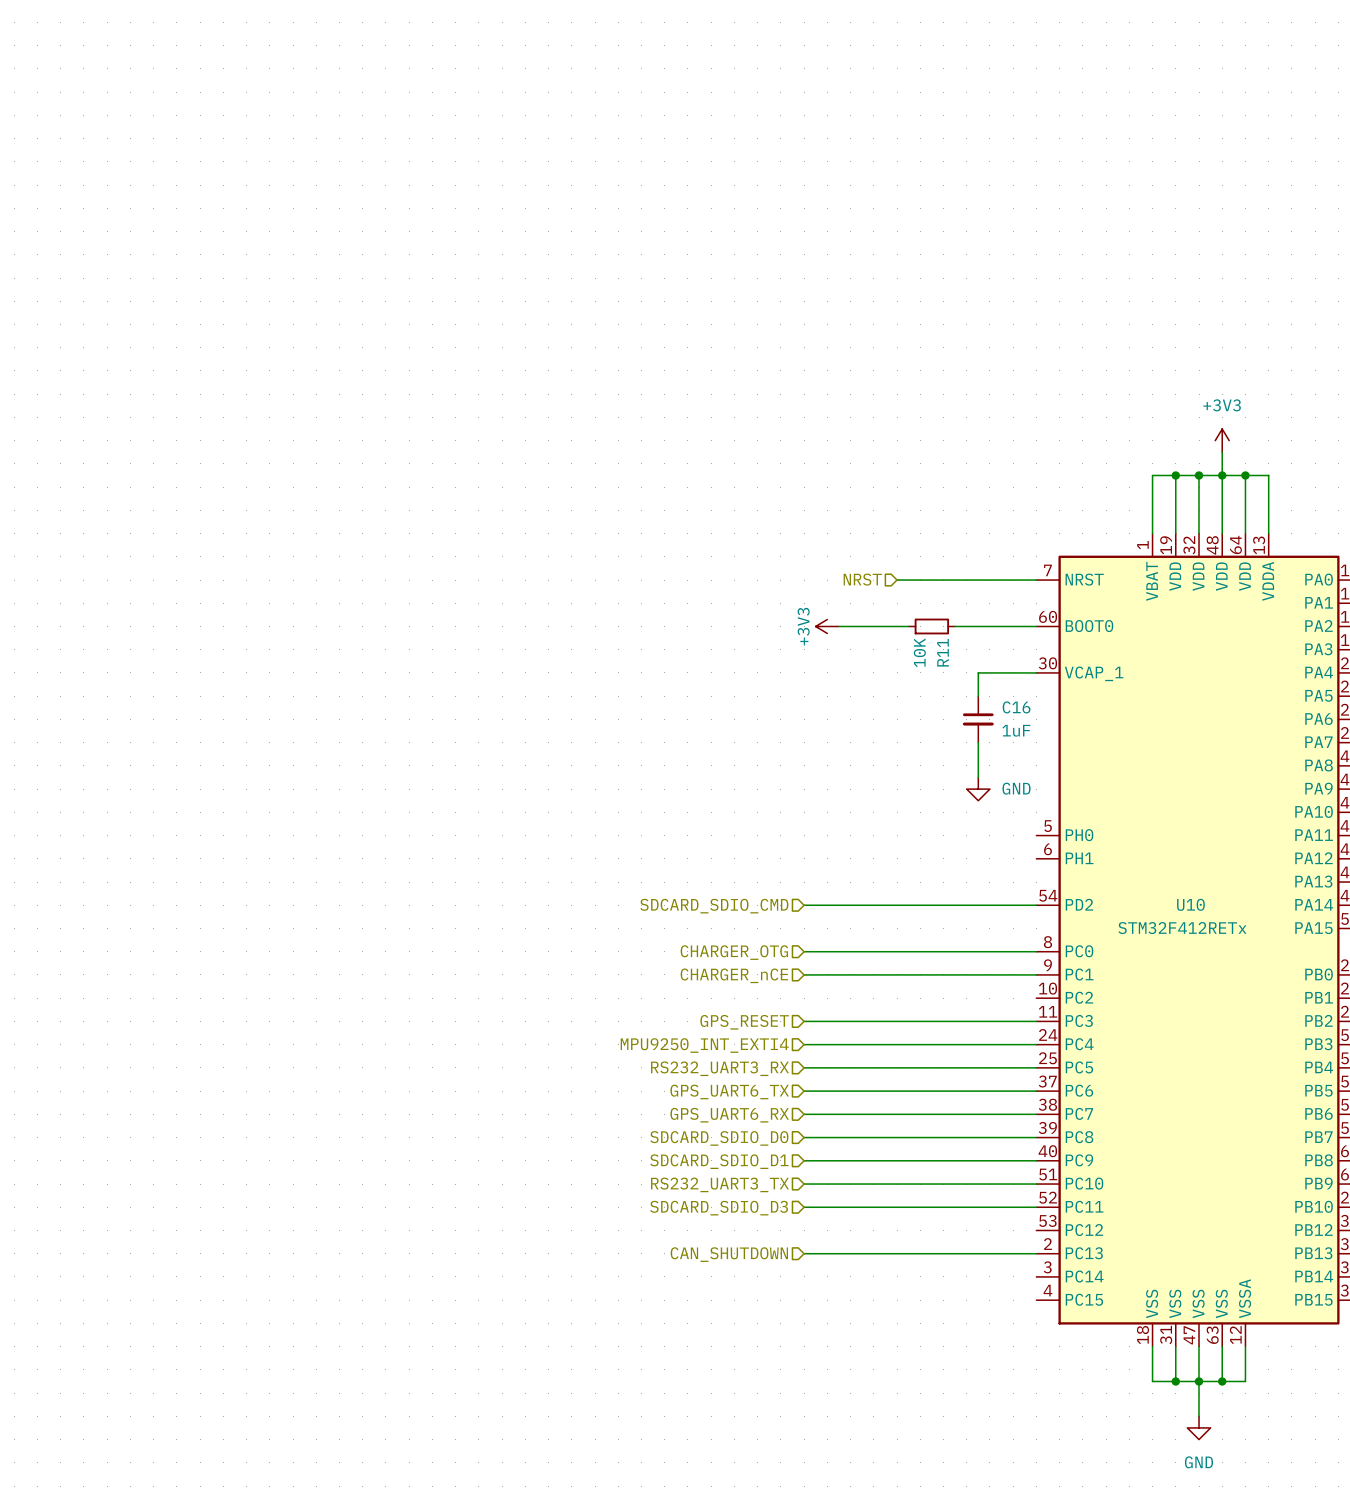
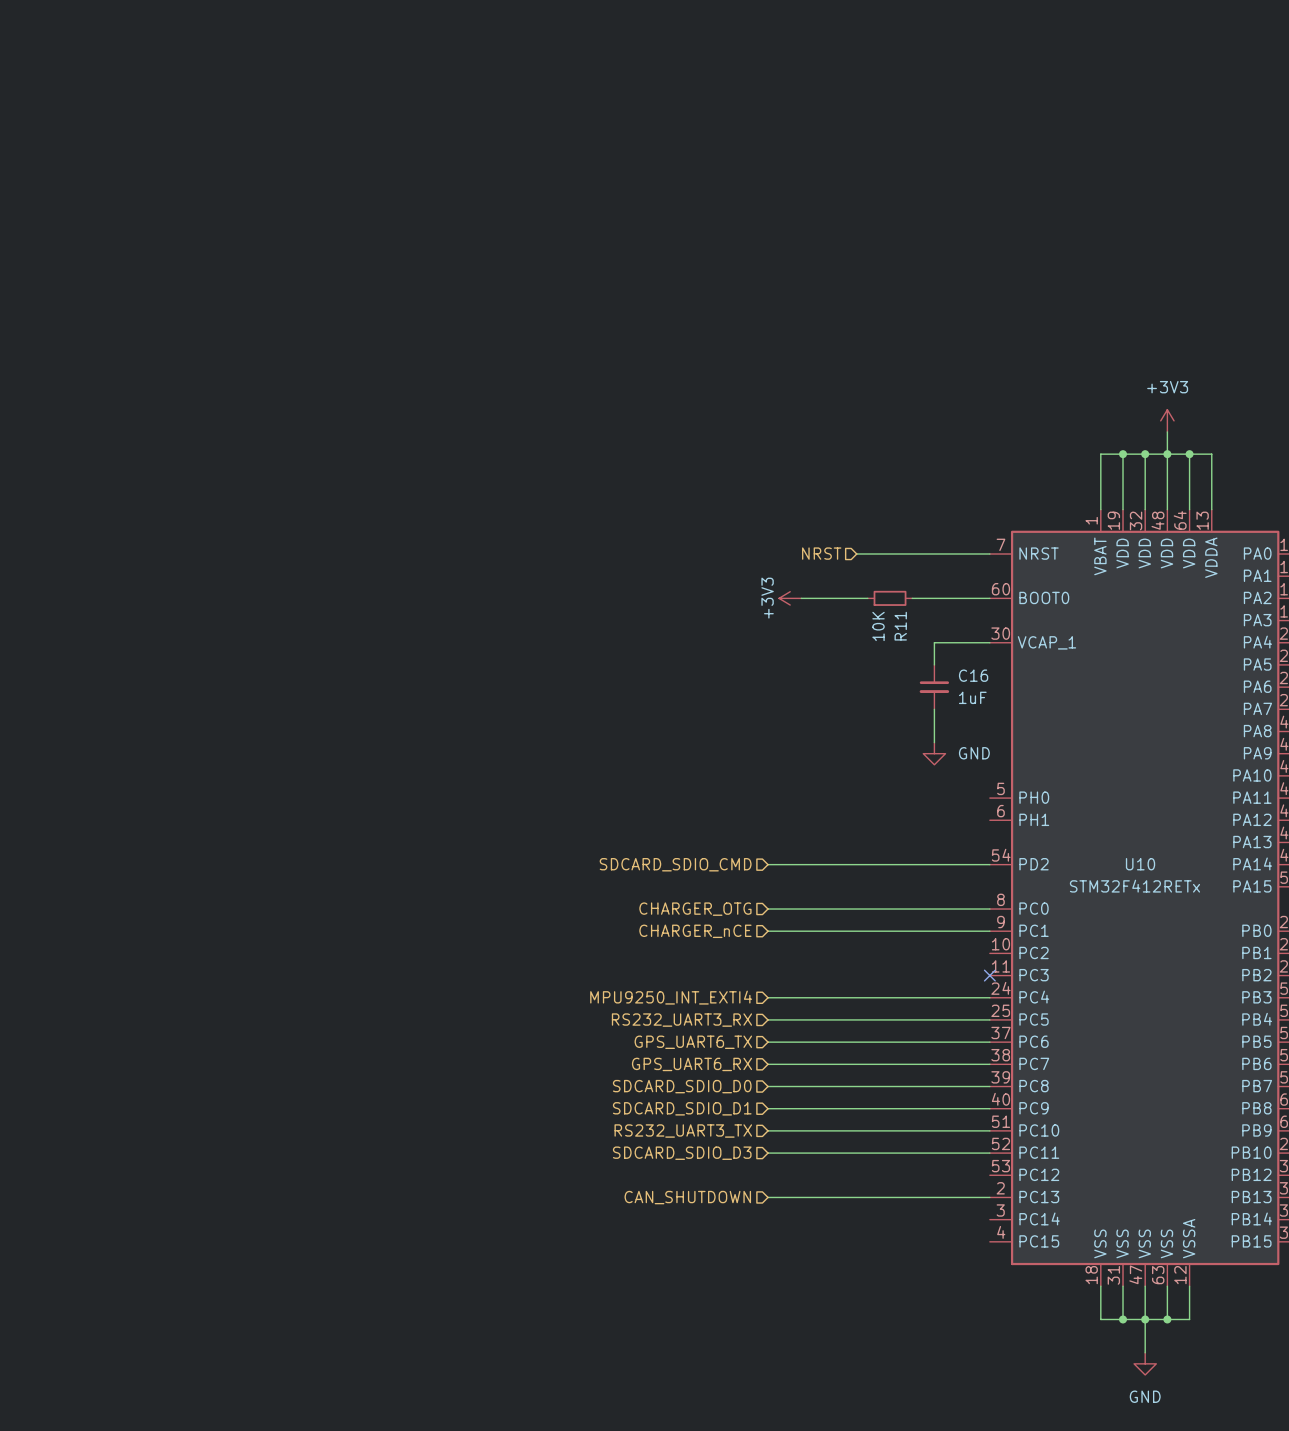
wire: (804, 1021) (1036, 1021) -> none
no-connect mark: none -> (989, 975)
hierarchical label: GPS_RESET (744, 1022) -> none

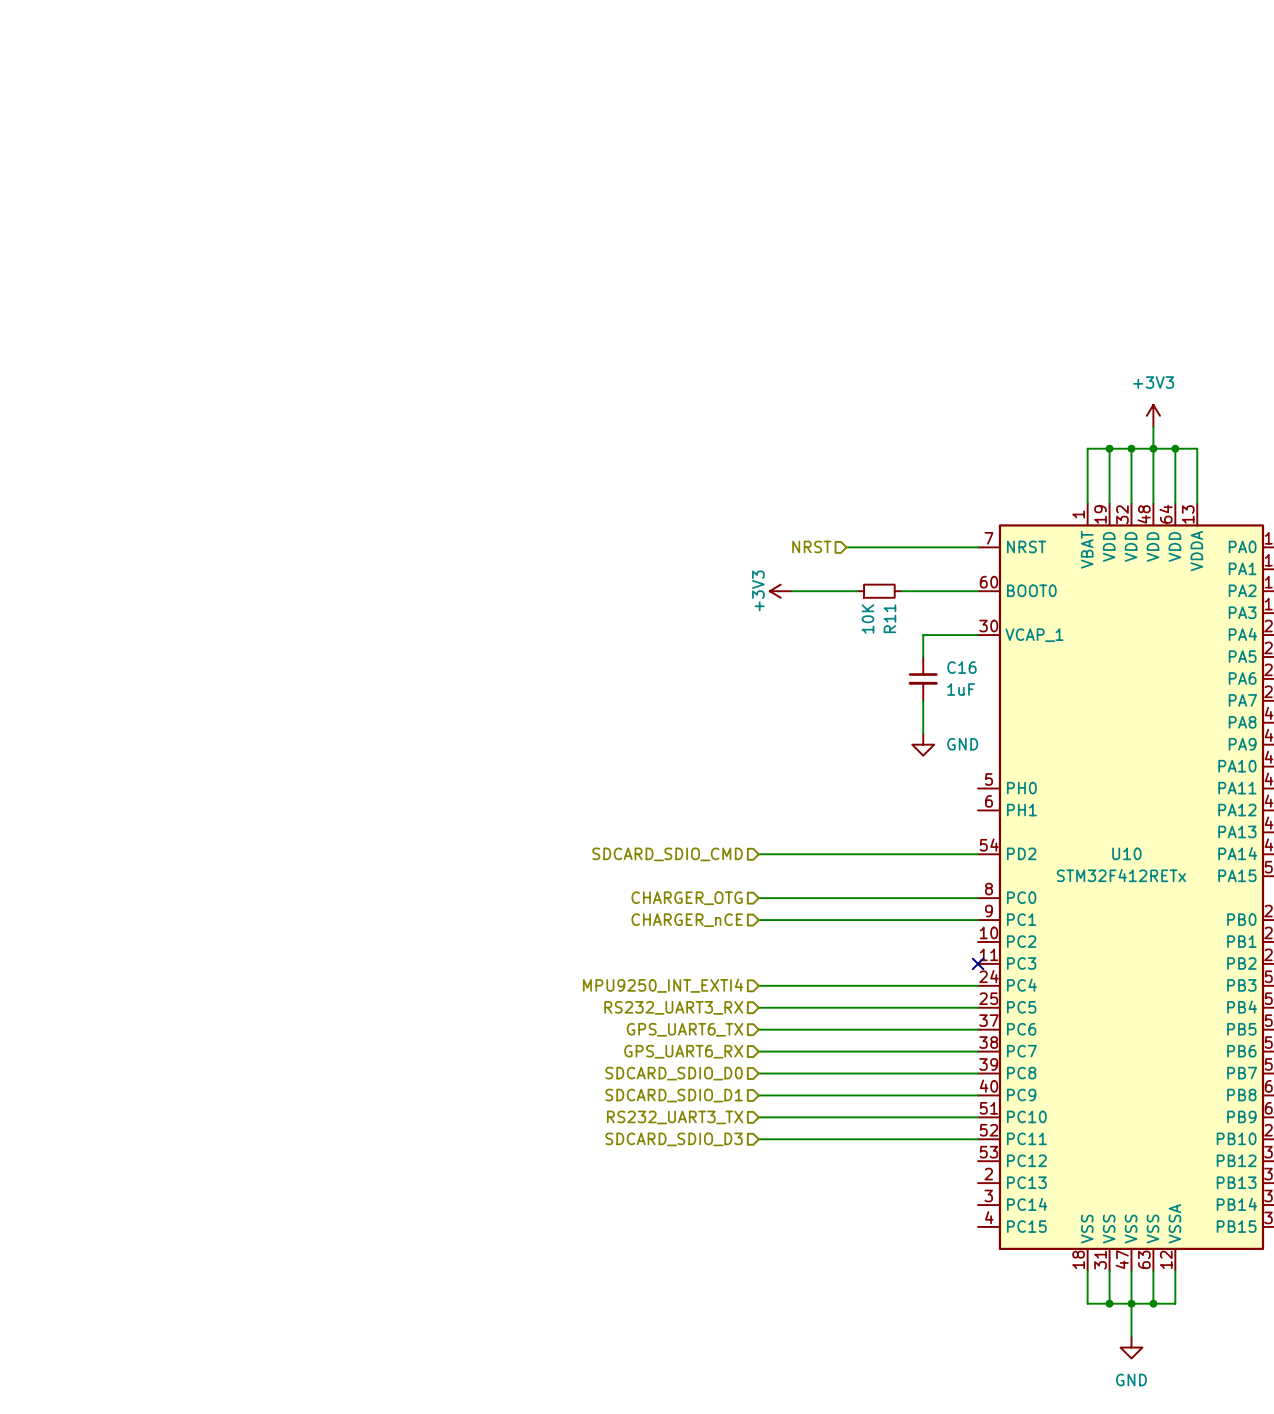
hierarchical label: CAN_SHUTDOWN (687, 1197) -> none
wire: (767, 1197) (989, 1197) -> none

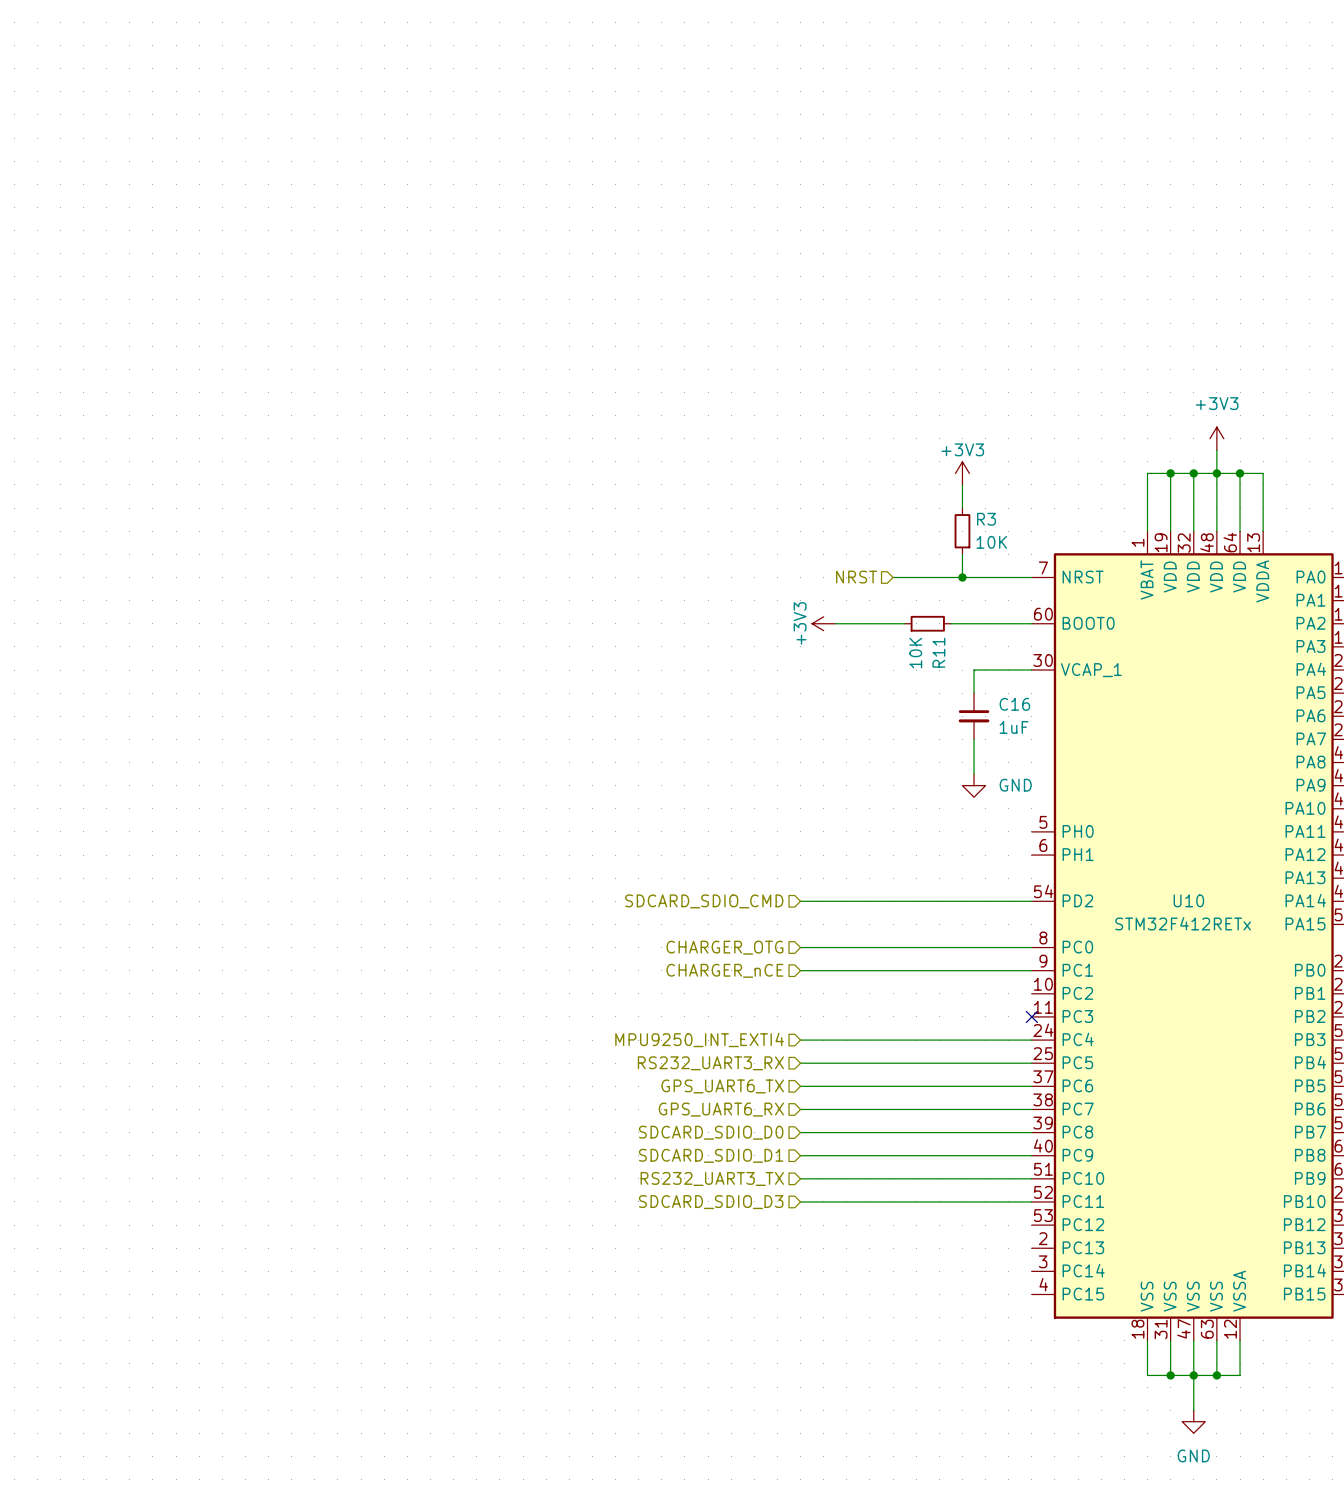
power symbol: none -> +3V3 (962, 473)
wire: none -> (962, 484) (962, 508)
R3: none -> 10K (962, 531)
wire: none -> (962, 554) (962, 577)
junction: none -> (962, 577)

